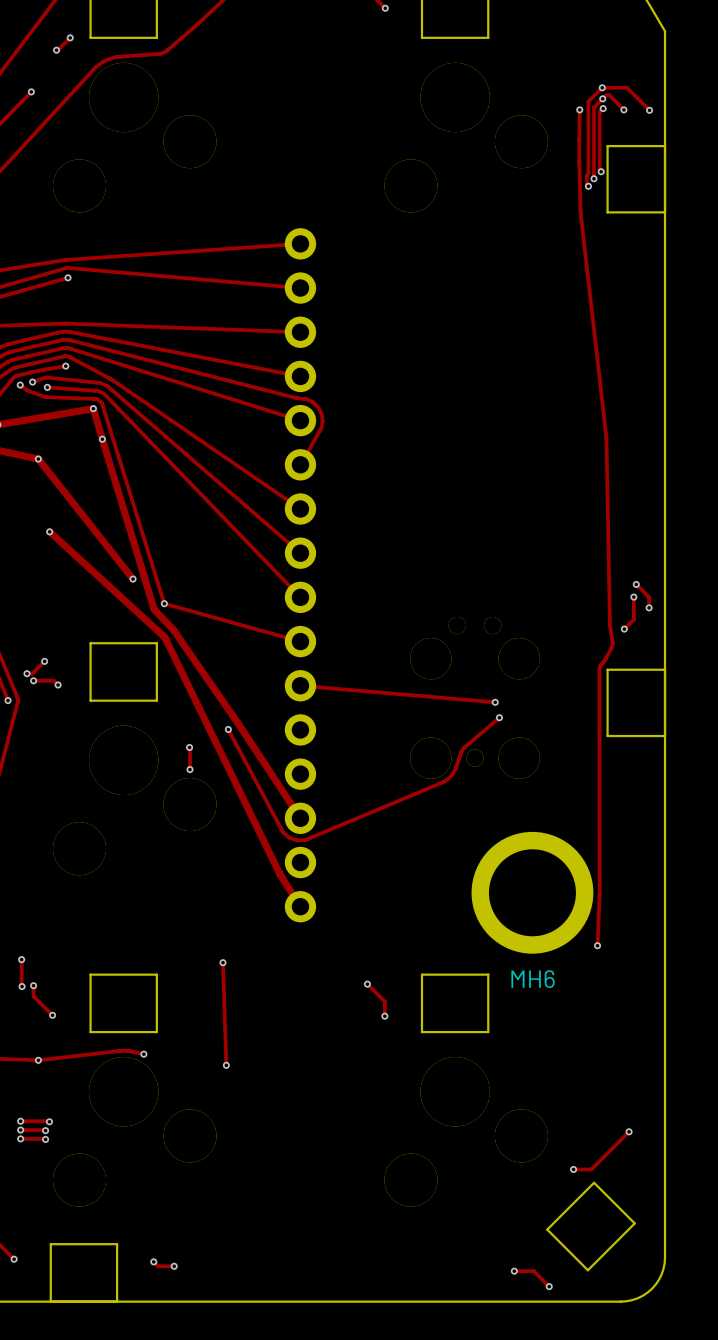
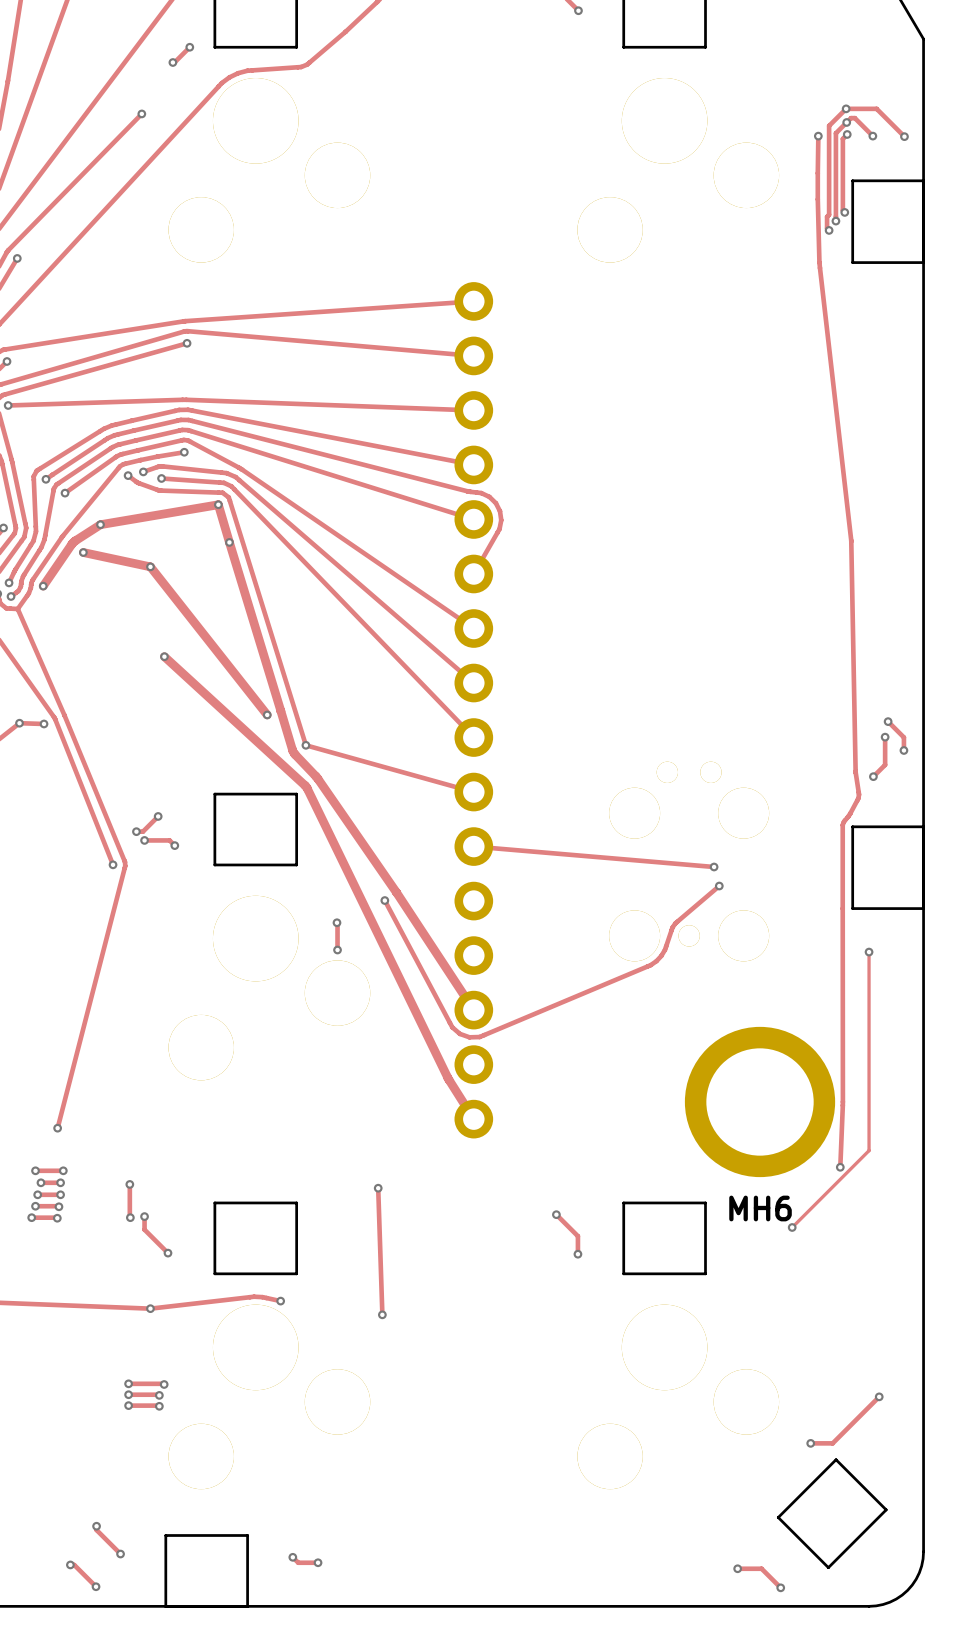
track: none -> (869, 952) (869, 1150) (792, 1227)
via: none -> (869, 952)
via: none -> (792, 1227)

